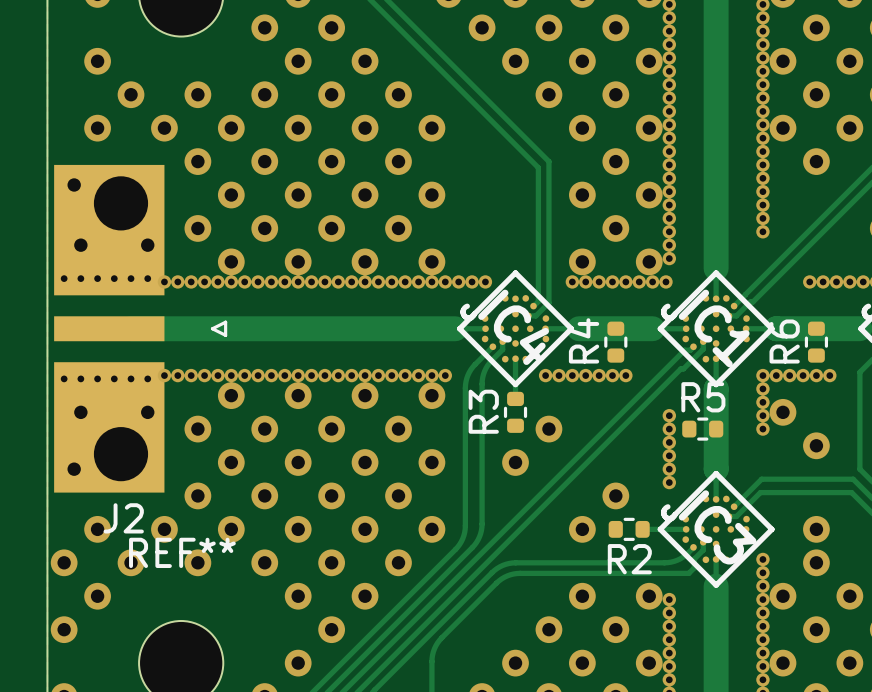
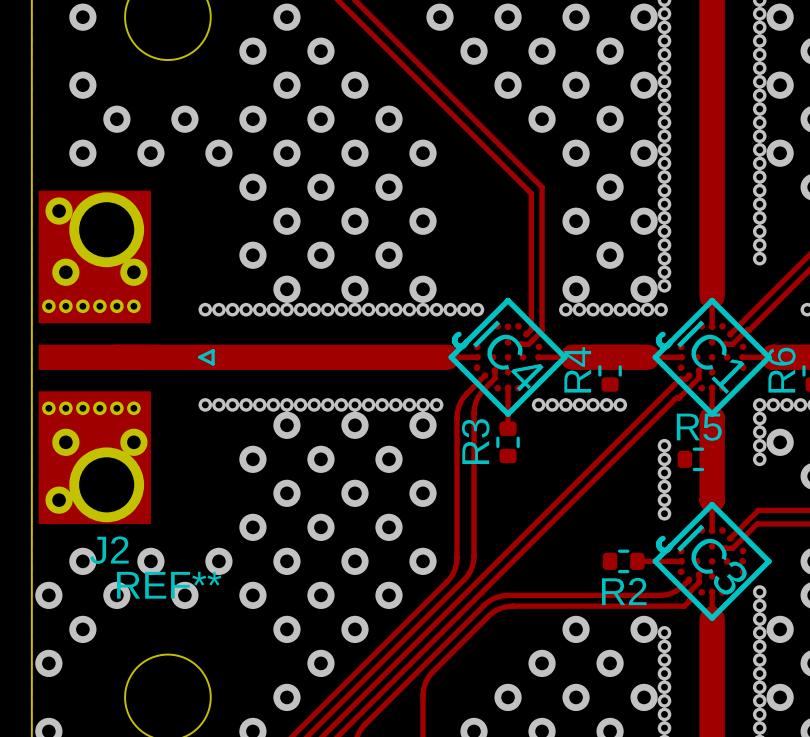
via: (197, 161) -> none
via: (231, 195) -> none
via: (197, 228) -> none
via: (231, 261) -> none
via: (164, 281) -> none
via: (177, 281) -> none
via: (191, 281) -> none
via: (204, 281) -> none
via: (164, 375) -> none
via: (177, 375) -> none
via: (191, 375) -> none
via: (204, 375) -> none
via: (231, 395) -> none
via: (197, 429) -> none
via: (548, 429) -> none
via: (231, 462) -> none
via: (515, 462) -> none
via: (197, 495) -> none
via: (615, 495) -> none
via: (582, 529) -> none

